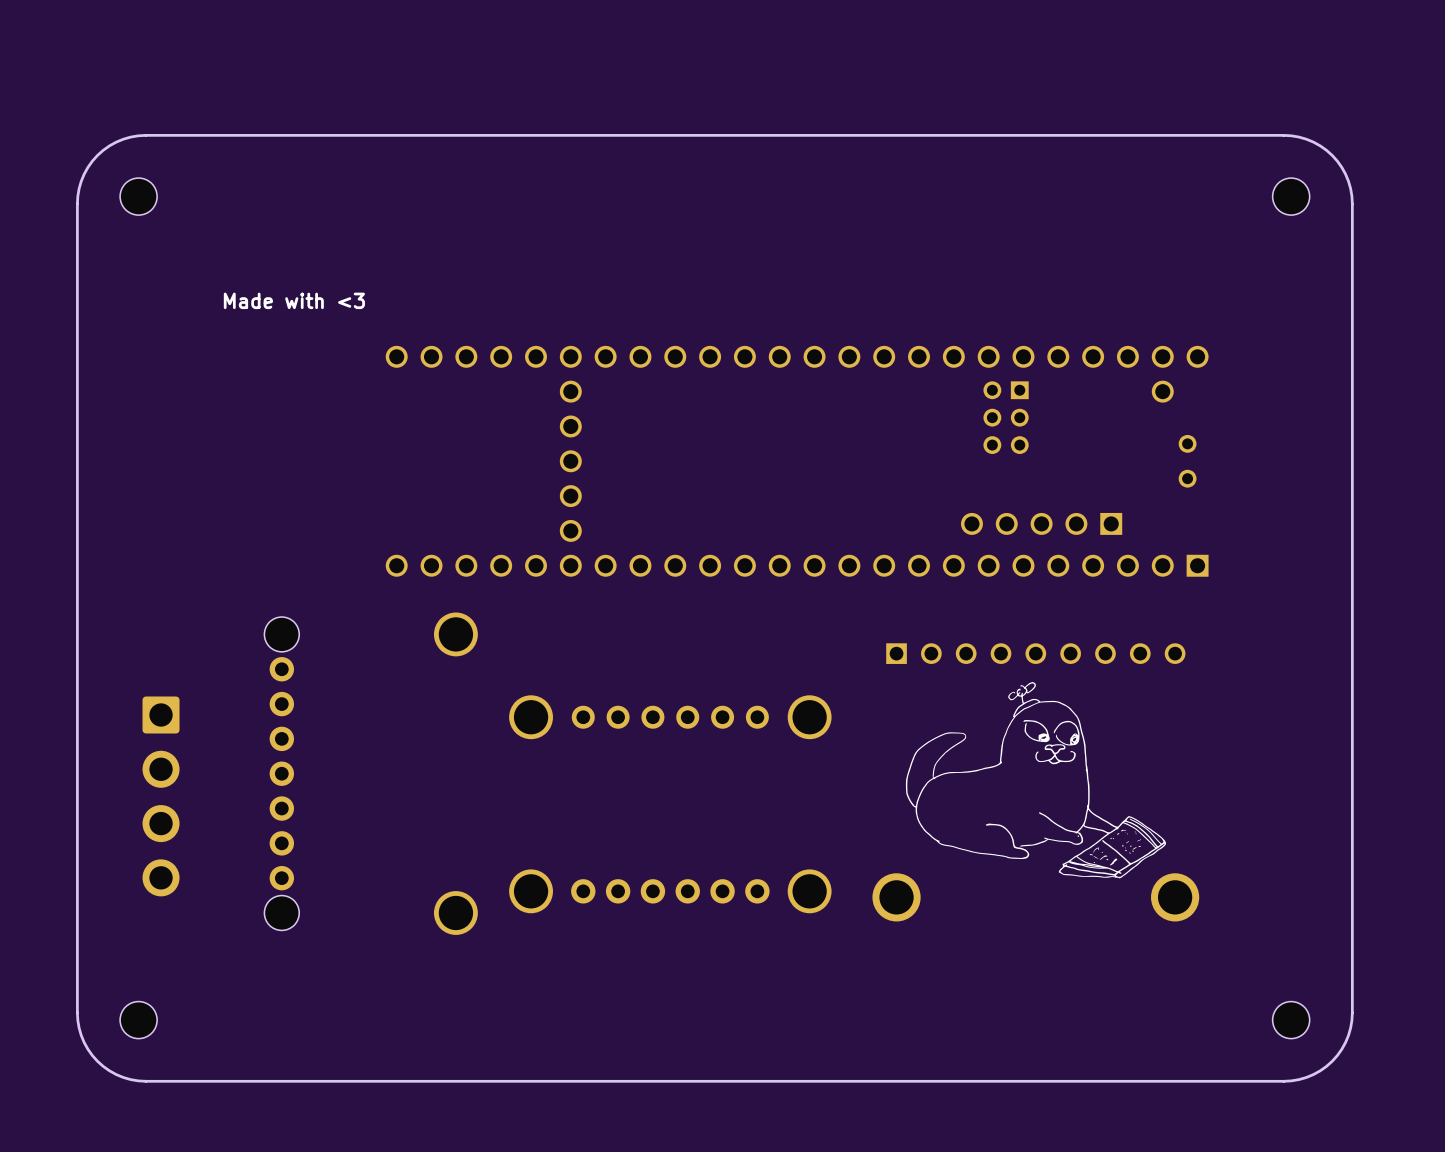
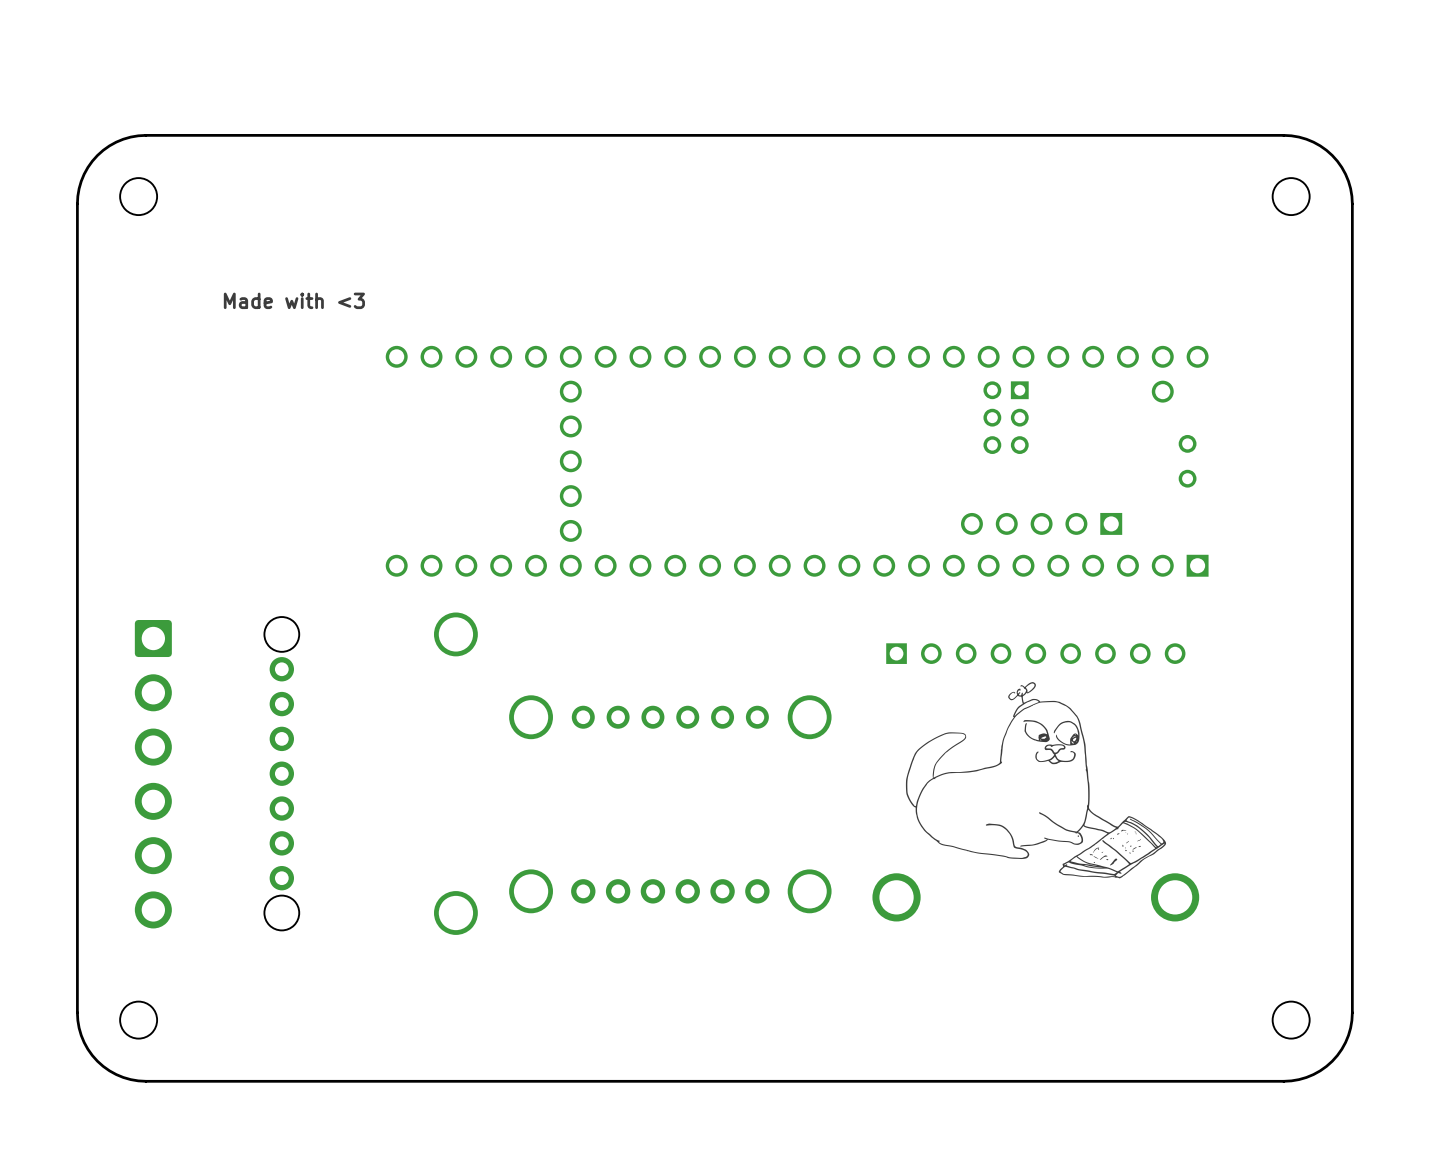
part: none -> (153, 774)
part: (161, 796) -> none

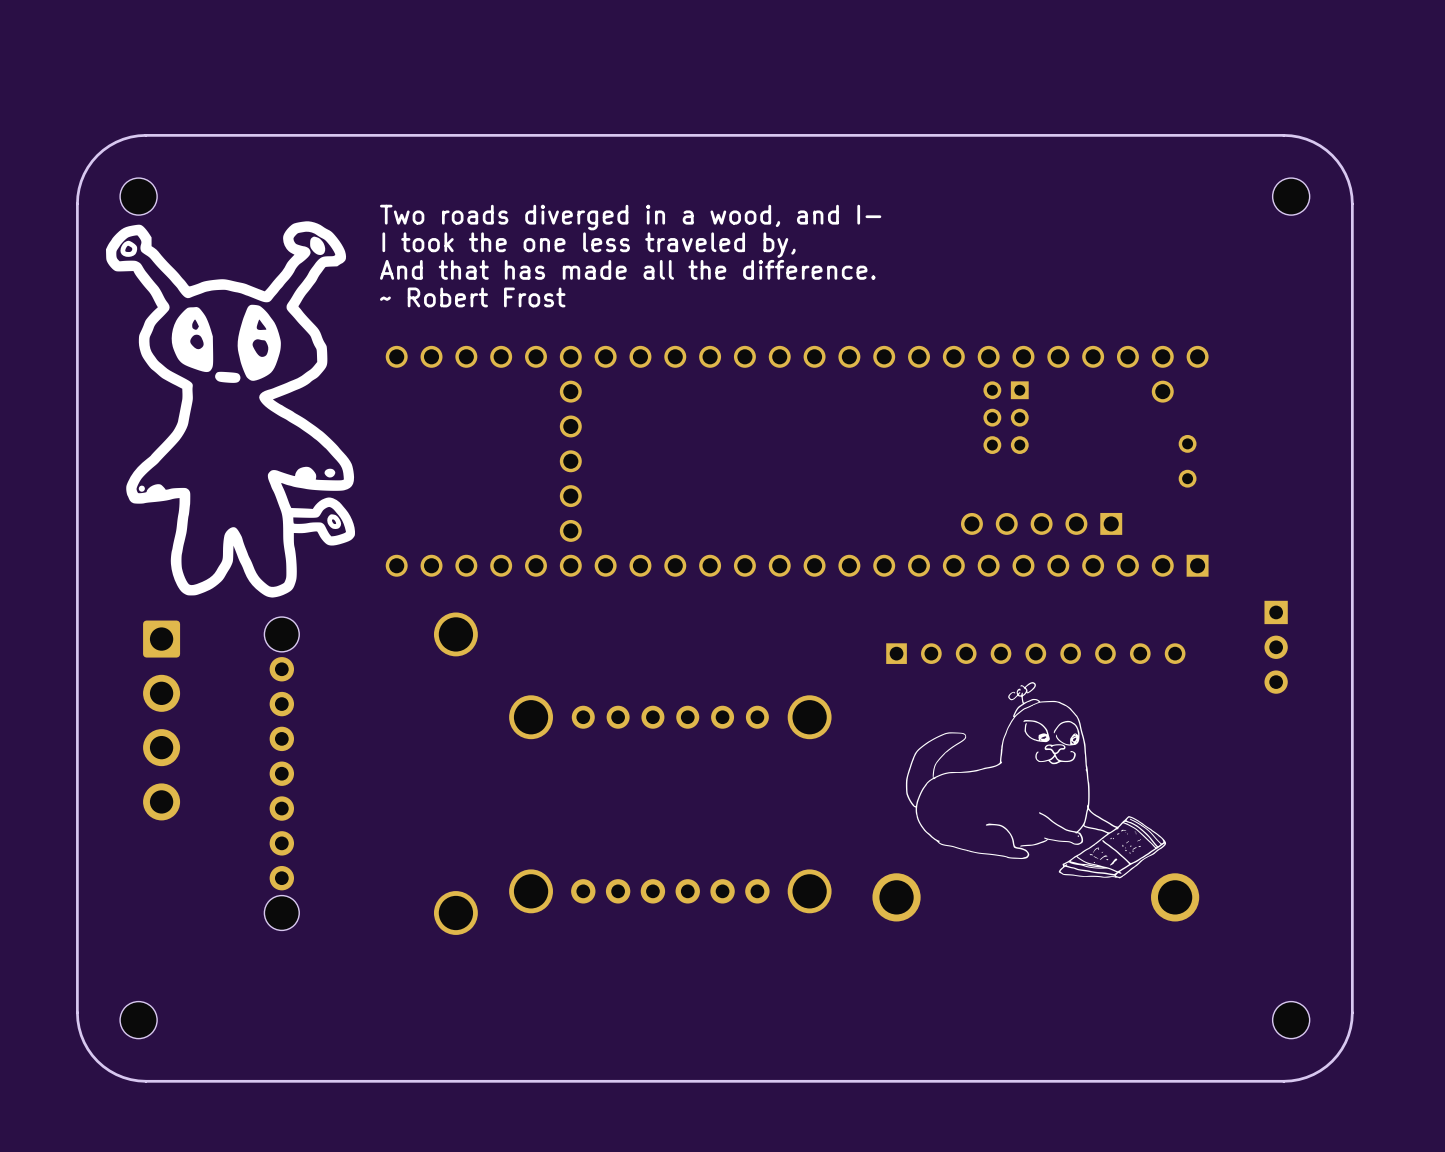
text: none -> Two roads diverged in a wood, and I- (630, 217)
drawing: none -> [105, 221, 356, 598]
text: none -> I took the one less traveled by, (589, 245)
text: none -> And that has made all the difference. (627, 269)
text: none -> ~ Robert Frost (472, 297)
text: Made with <3 (294, 300) -> none
part: none -> (1276, 647)
part: none -> (161, 720)
part: (153, 774) -> none

